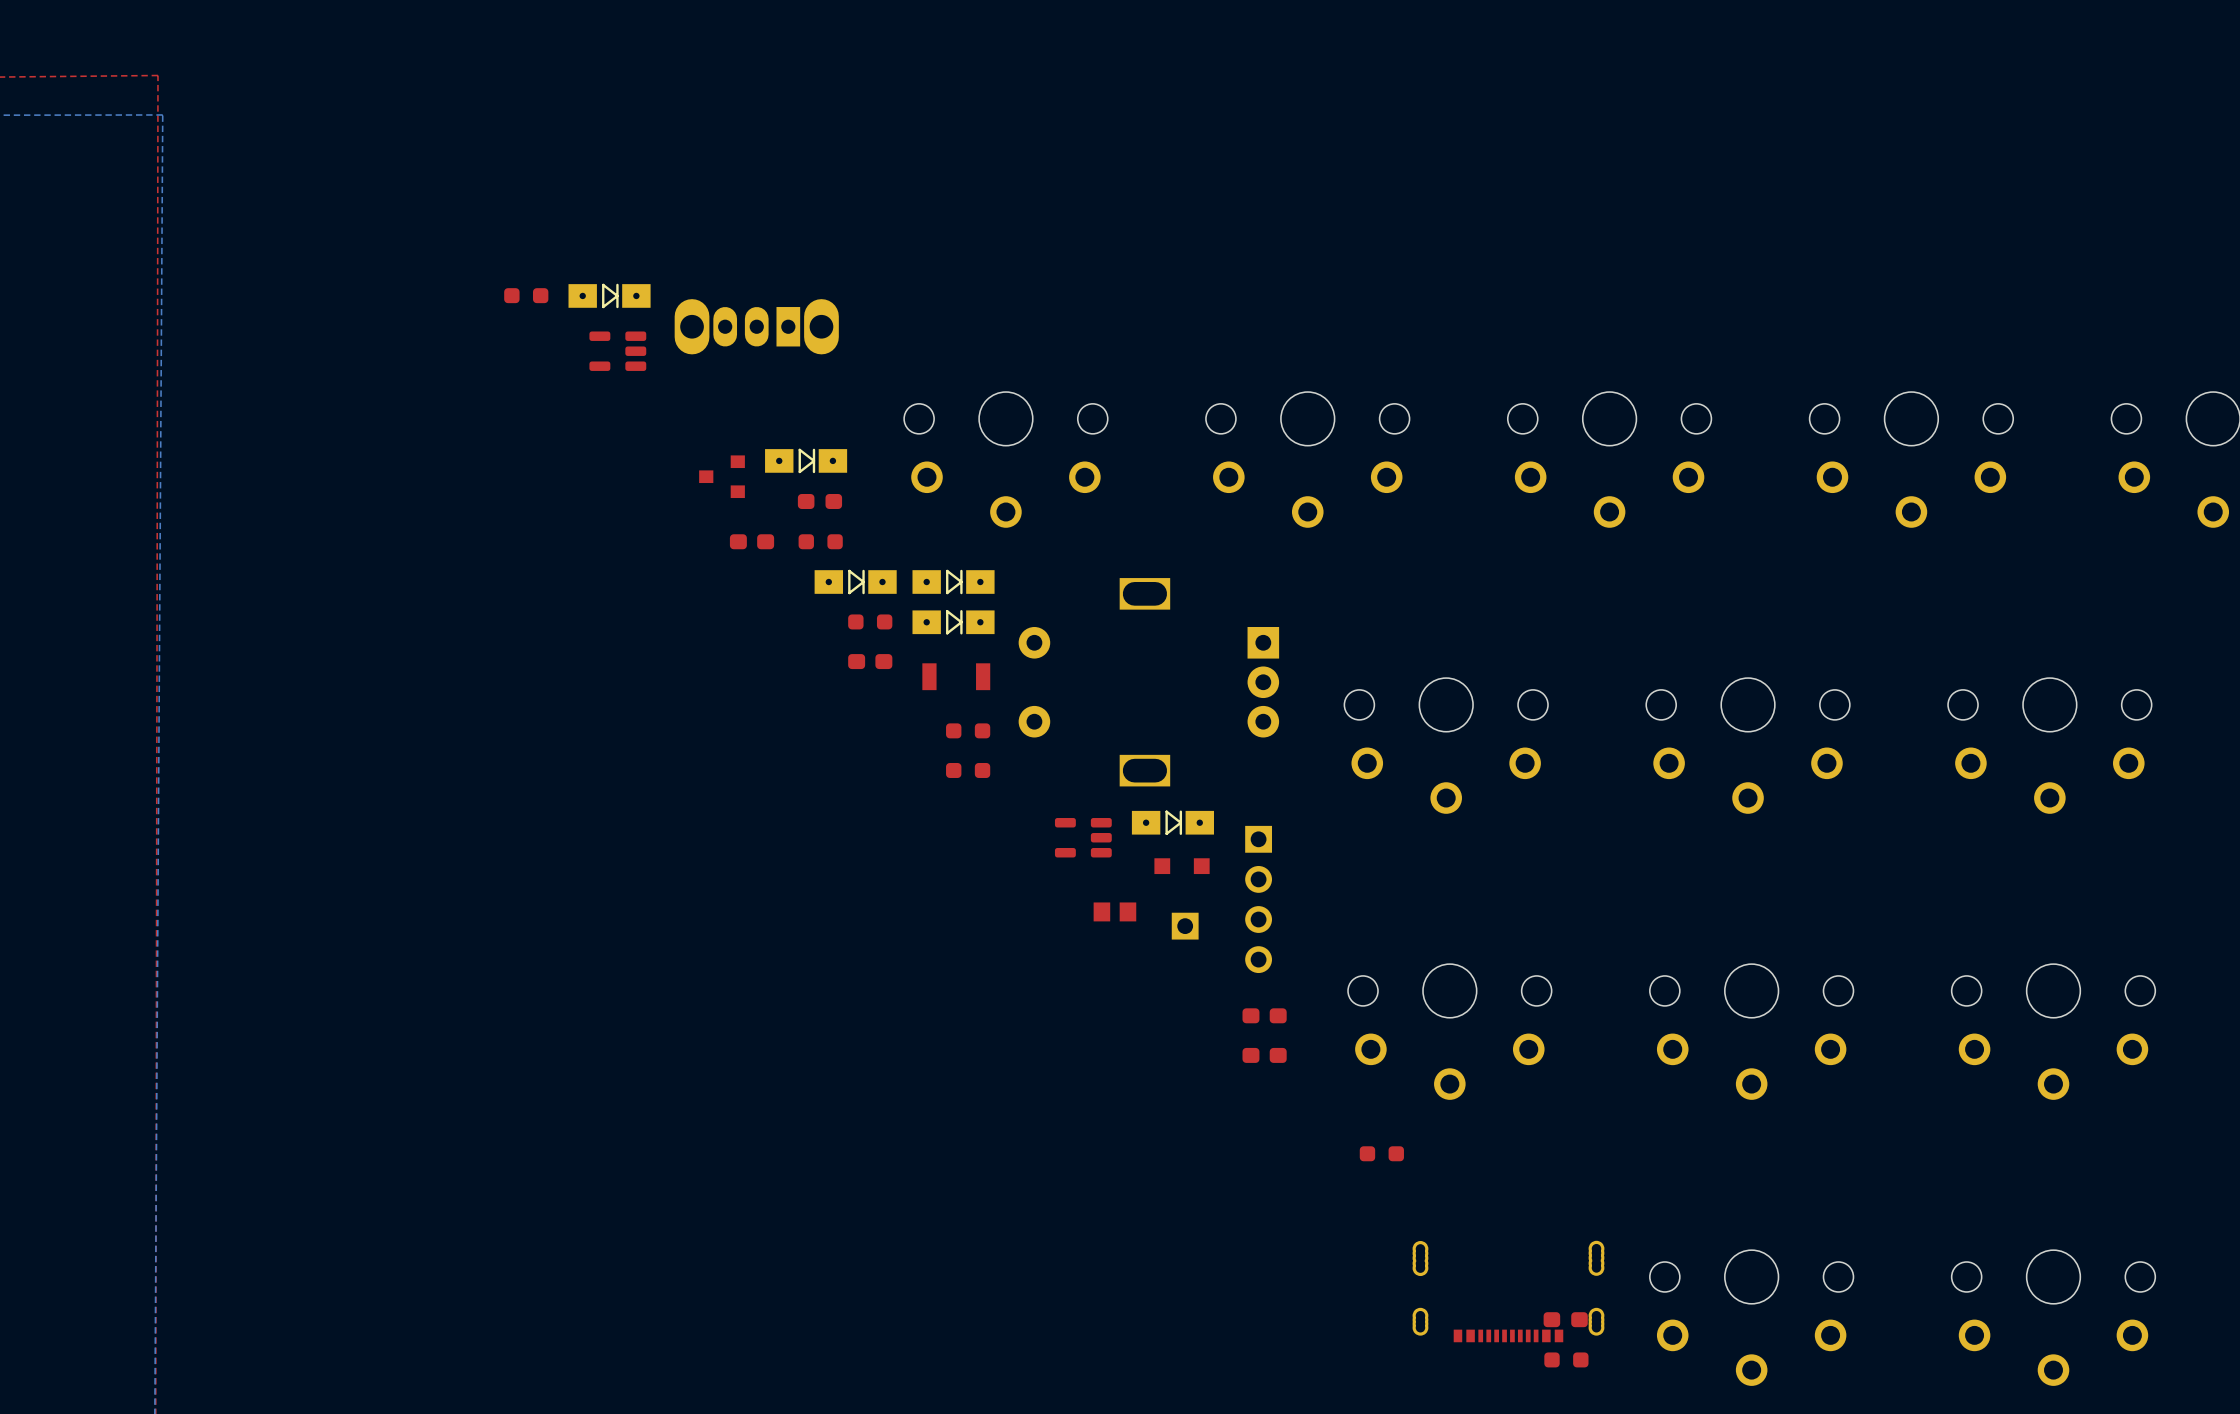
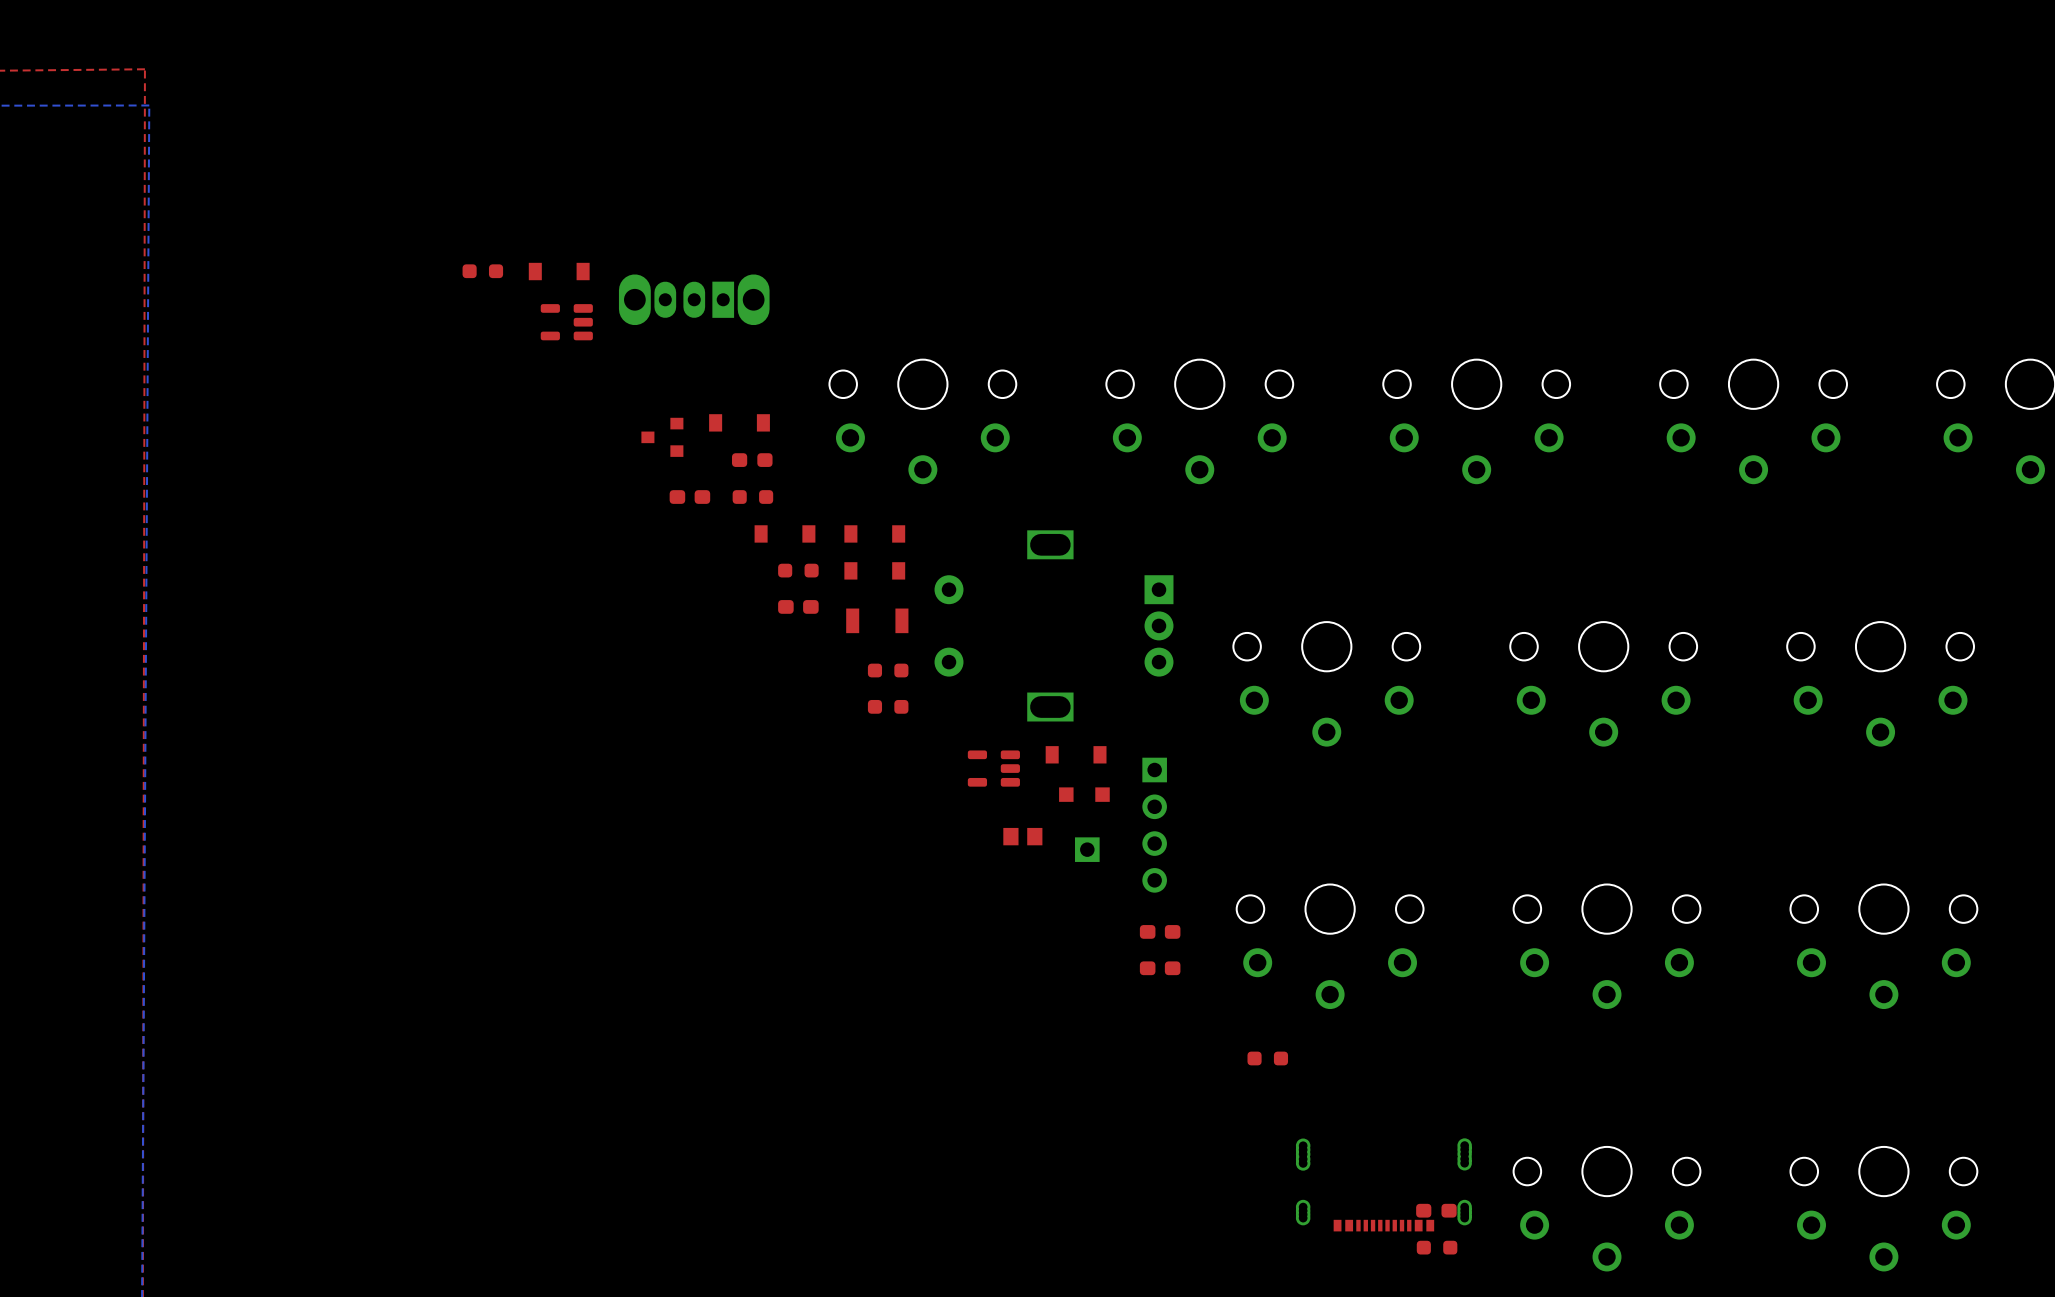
part footprint: [568, 283, 651, 309] -> [528, 262, 590, 281]
part footprint: [765, 448, 848, 474] -> [709, 414, 770, 432]
part footprint: [814, 569, 897, 595] -> [754, 525, 816, 543]
part footprint: [912, 569, 995, 595] -> [844, 525, 906, 543]
part footprint: [912, 610, 995, 635] -> [844, 562, 906, 580]
part footprint: [1131, 810, 1214, 835] -> [1045, 746, 1107, 764]

